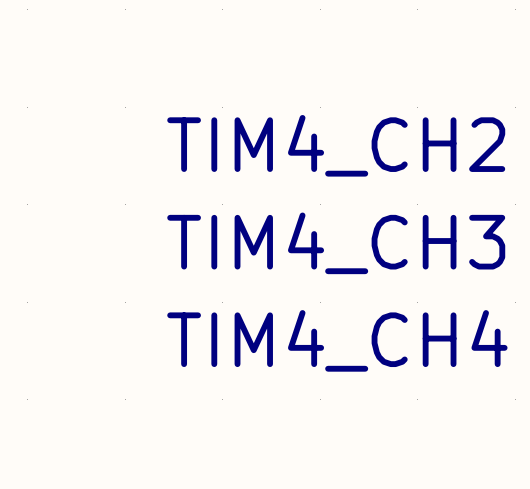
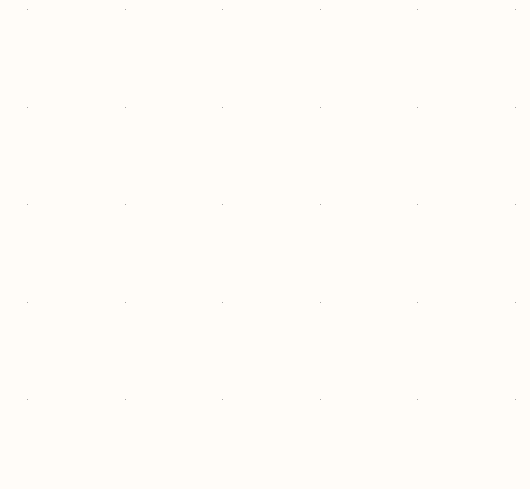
text: TIM4_CH2 (336, 145) -> none
text: TIM4_CH3 (336, 243) -> none
text: TIM4_CH4 (337, 340) -> none

